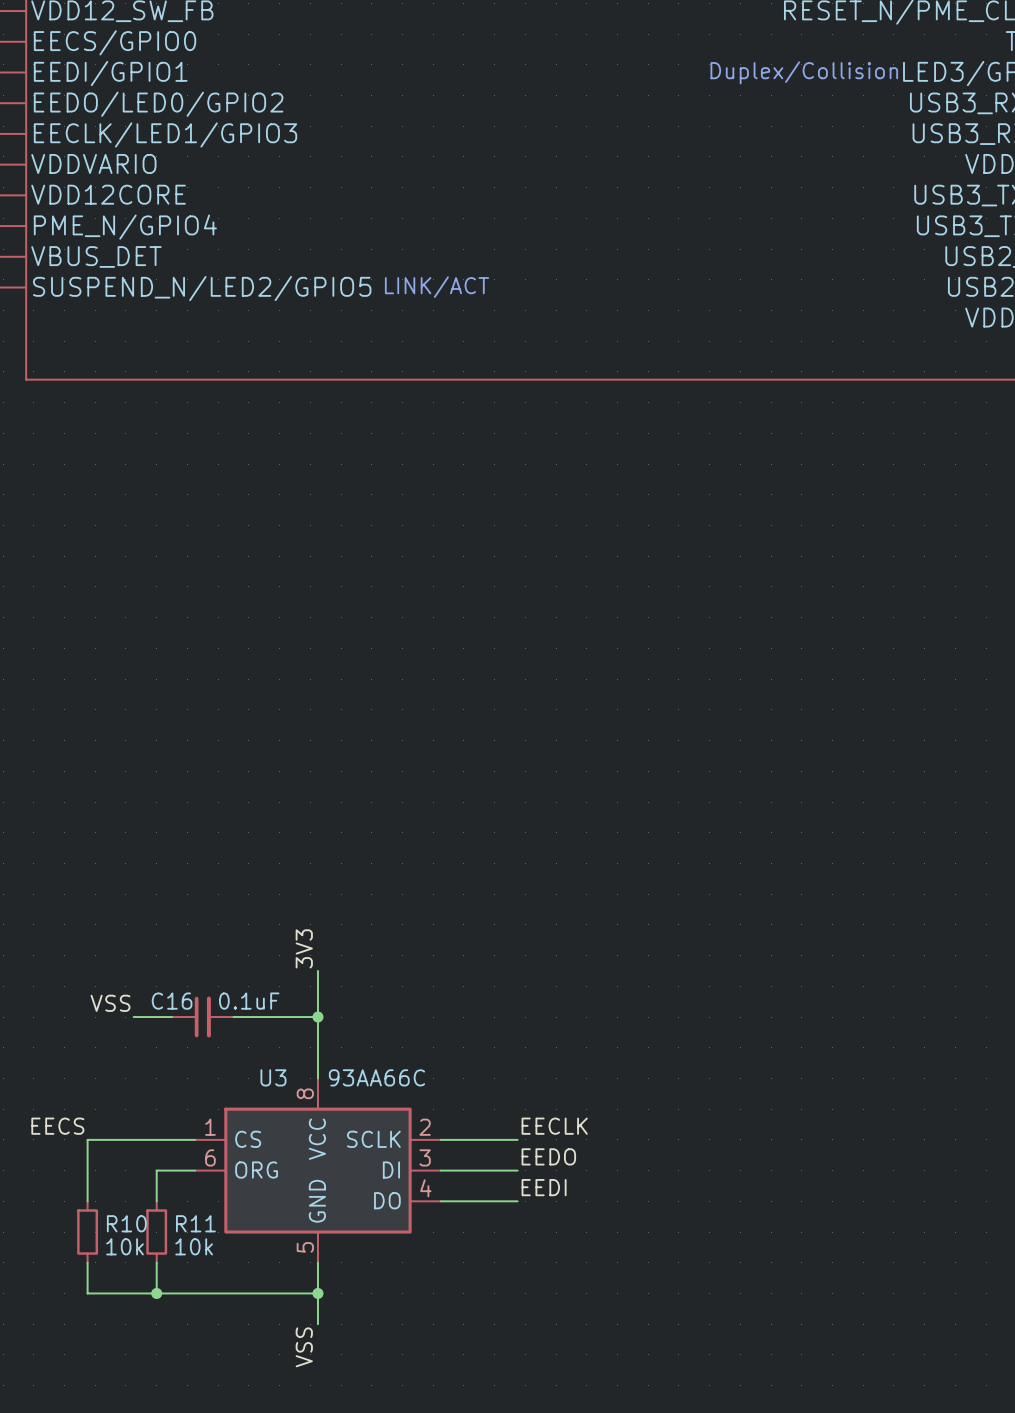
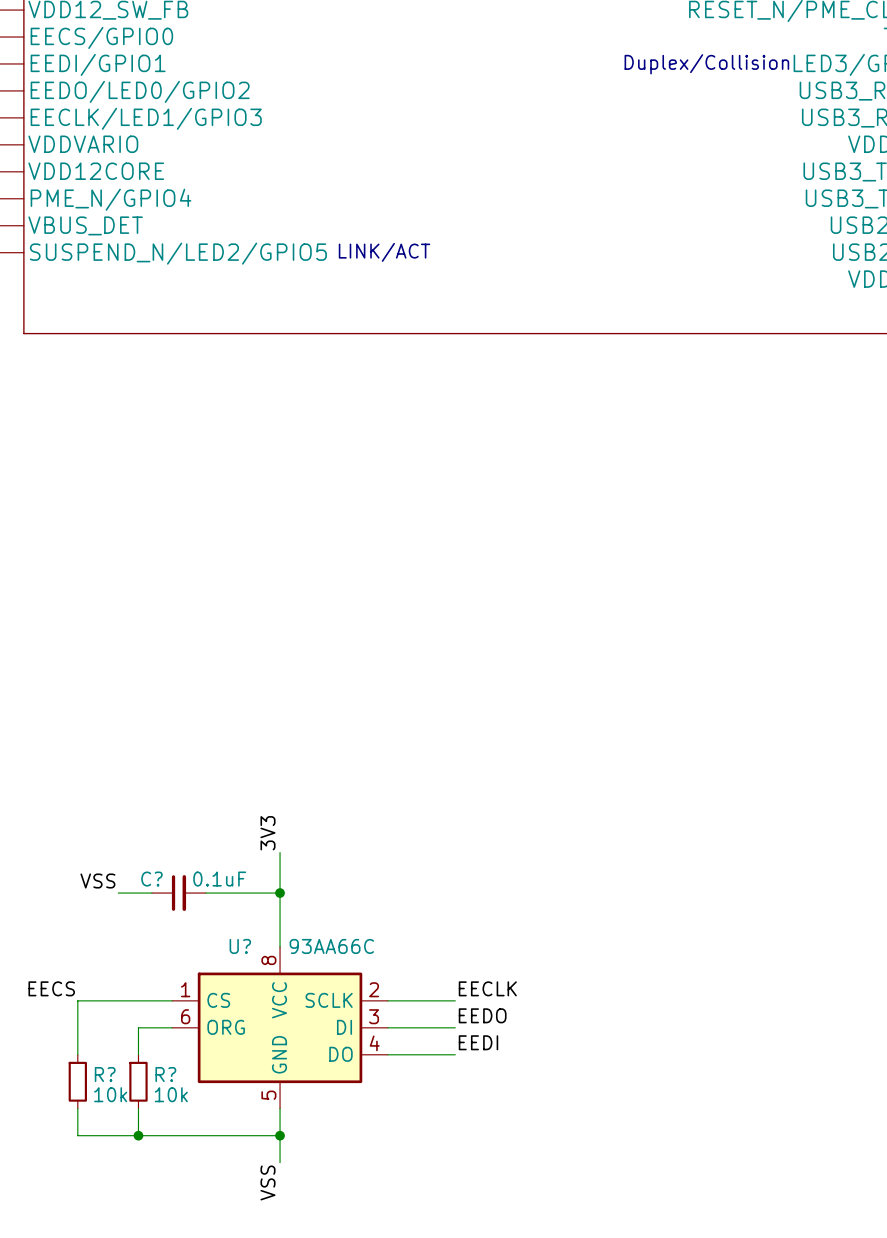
C16 name: C16 (172, 1001) -> C? (151, 879)
U3 name: U3 (273, 1077) -> U? (240, 946)
R10 name: R10 (126, 1223) -> R? (105, 1074)
R11 name: R11 (195, 1223) -> R? (165, 1074)

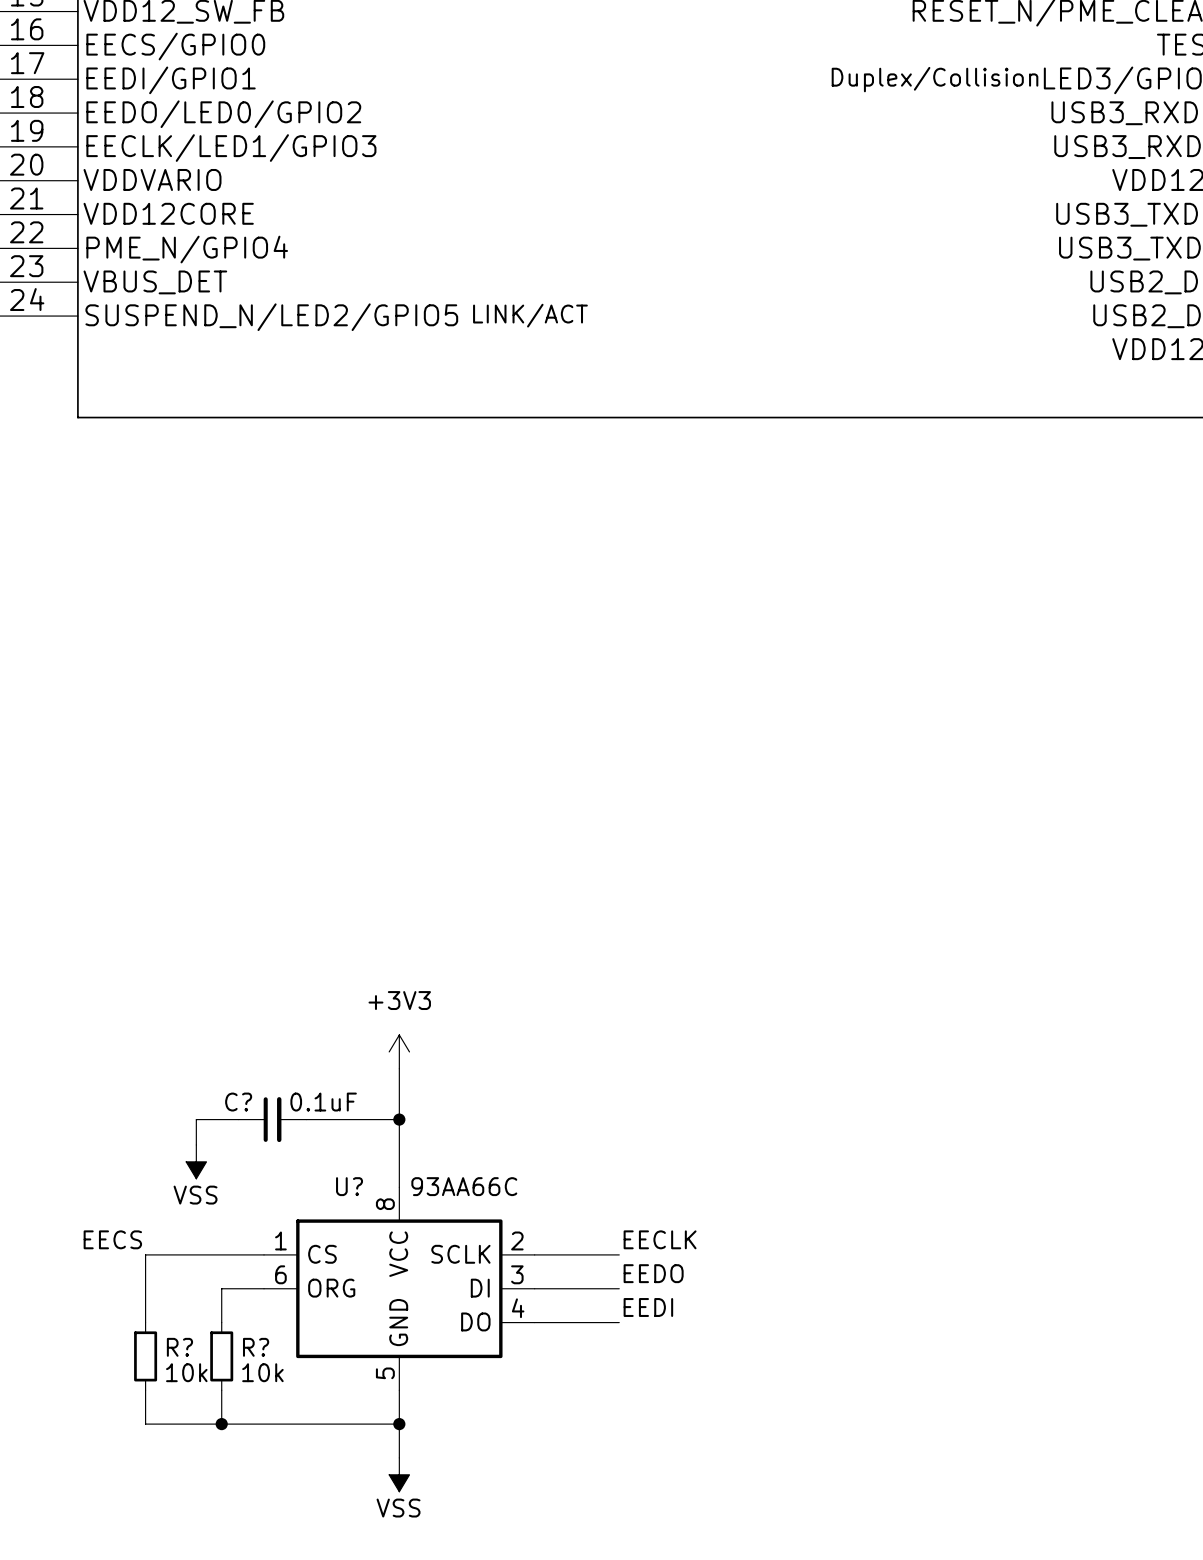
label: 3V3 (267, 833) -> none
power symbol: none -> +3V3 (399, 1051)
label: VSS (97, 881) -> none
wire: none -> (196, 1119) (196, 1144)
power symbol: none -> VSS (196, 1161)
power symbol: none -> VSS (399, 1474)
label: VSS (267, 1182) -> none

